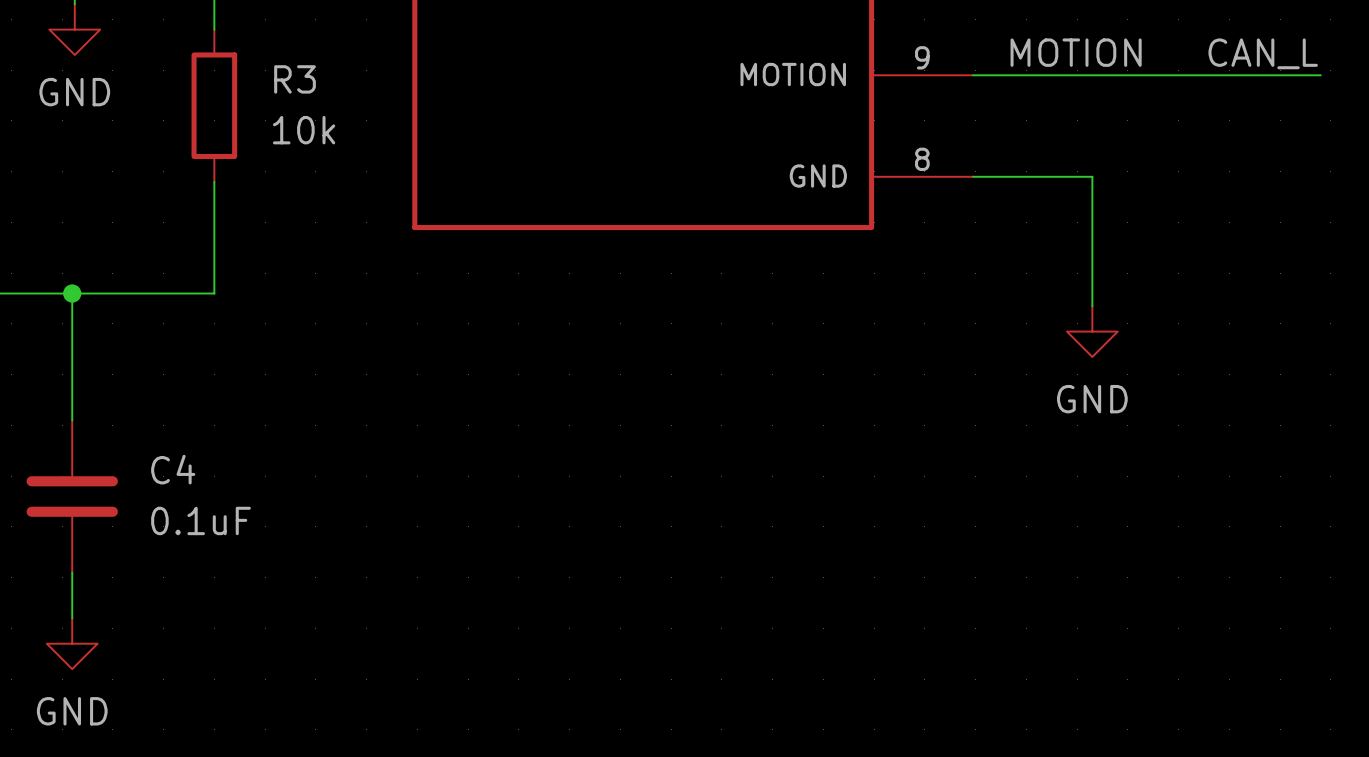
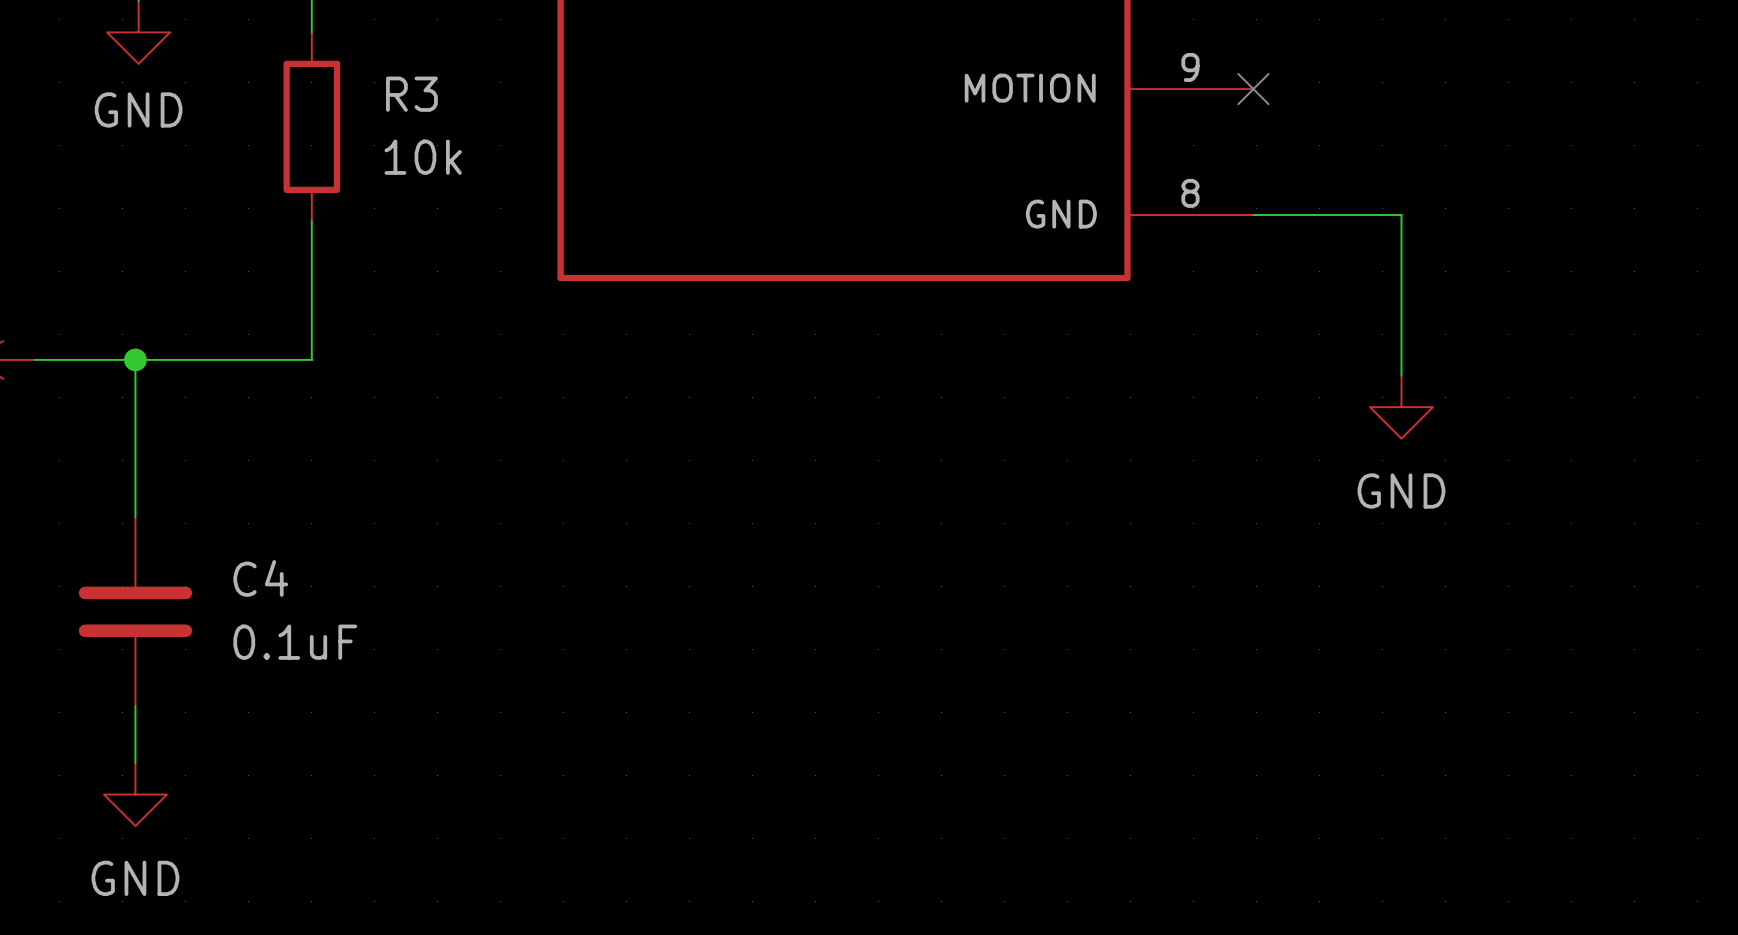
label: MOTION (1076, 52) -> none
label: CAN_L (1263, 53) -> none
wire: (973, 75) (1320, 75) -> none
no-connect mark: none -> (1253, 89)

